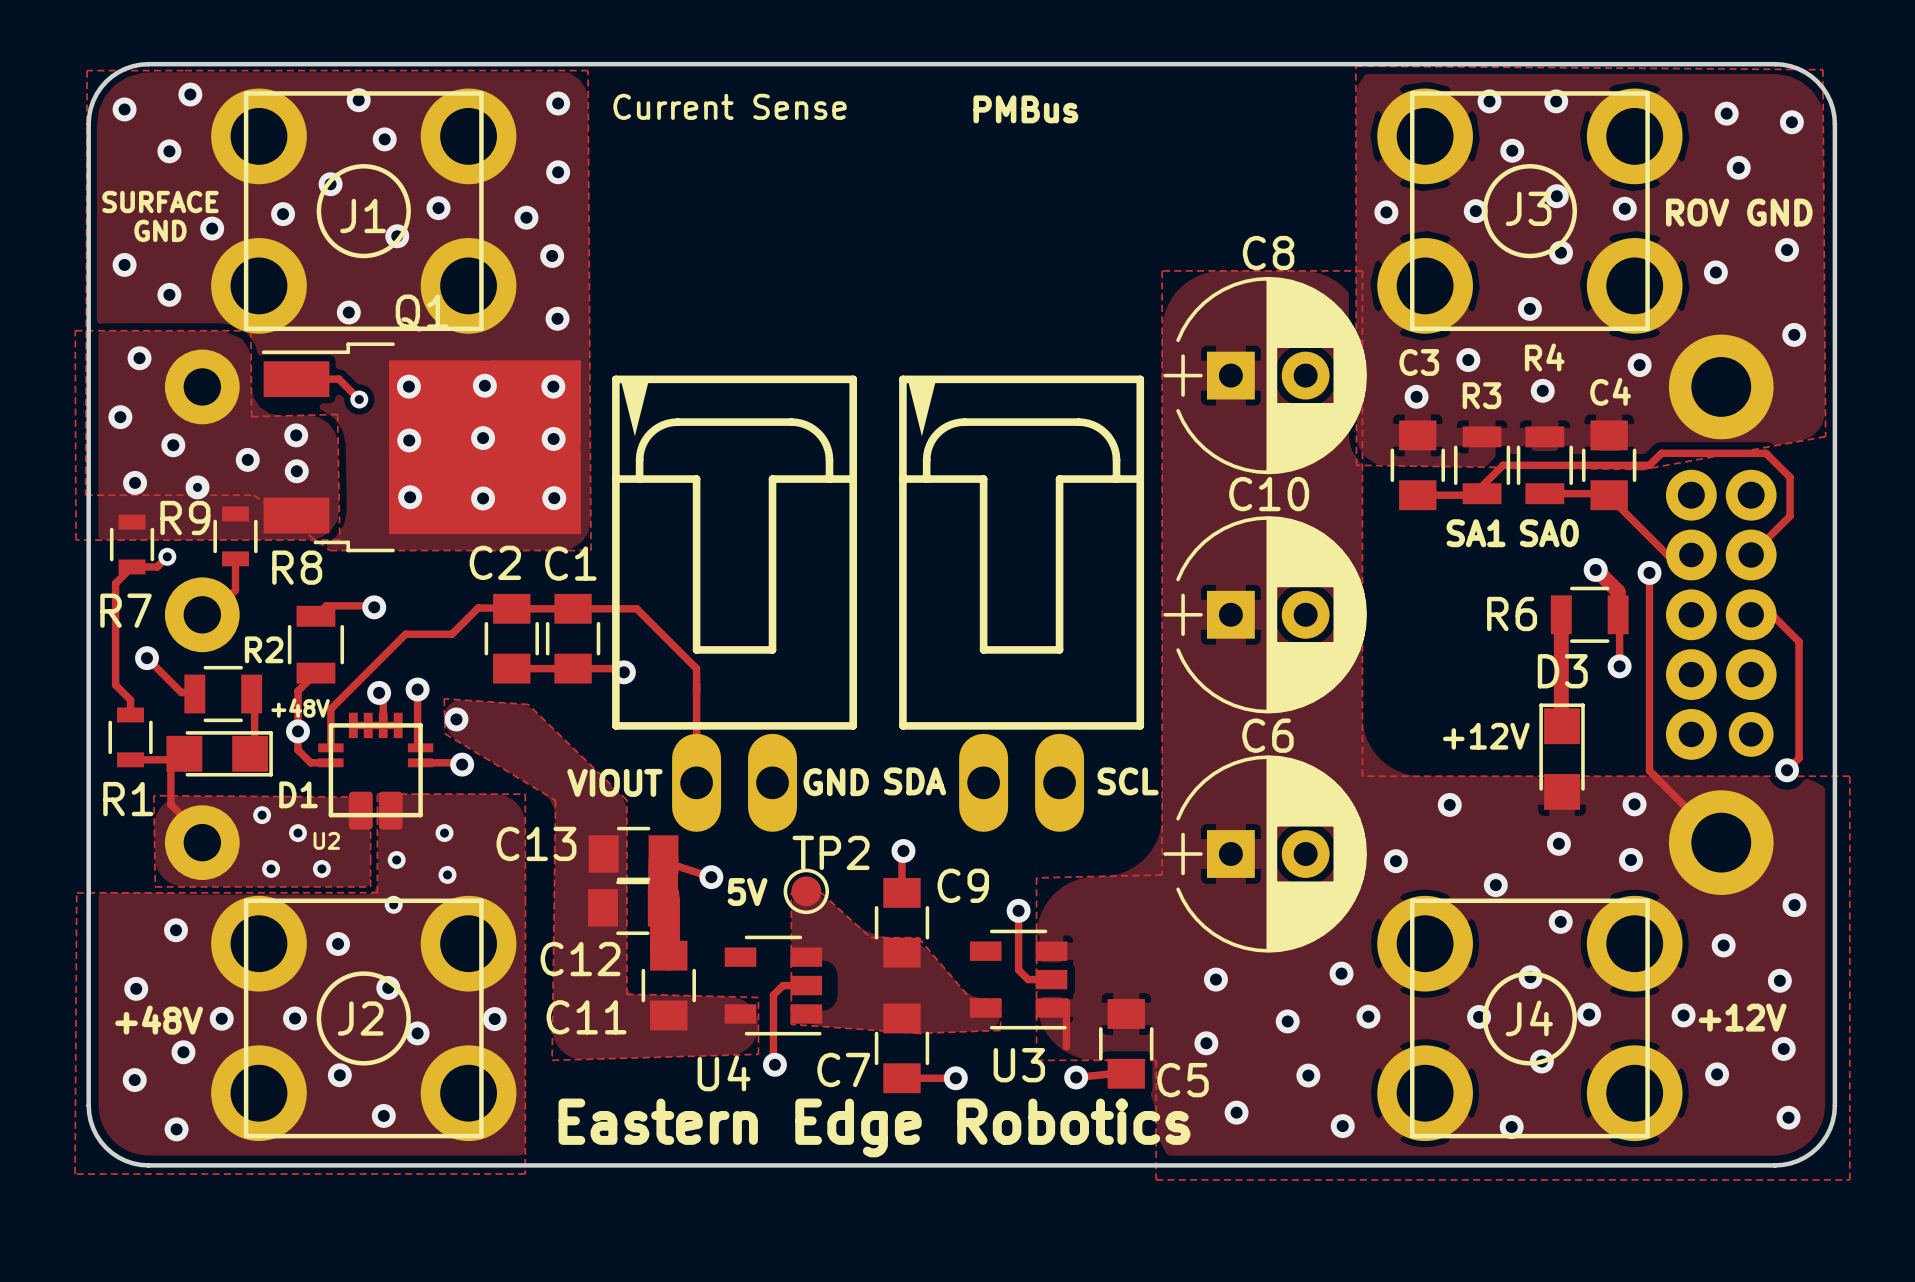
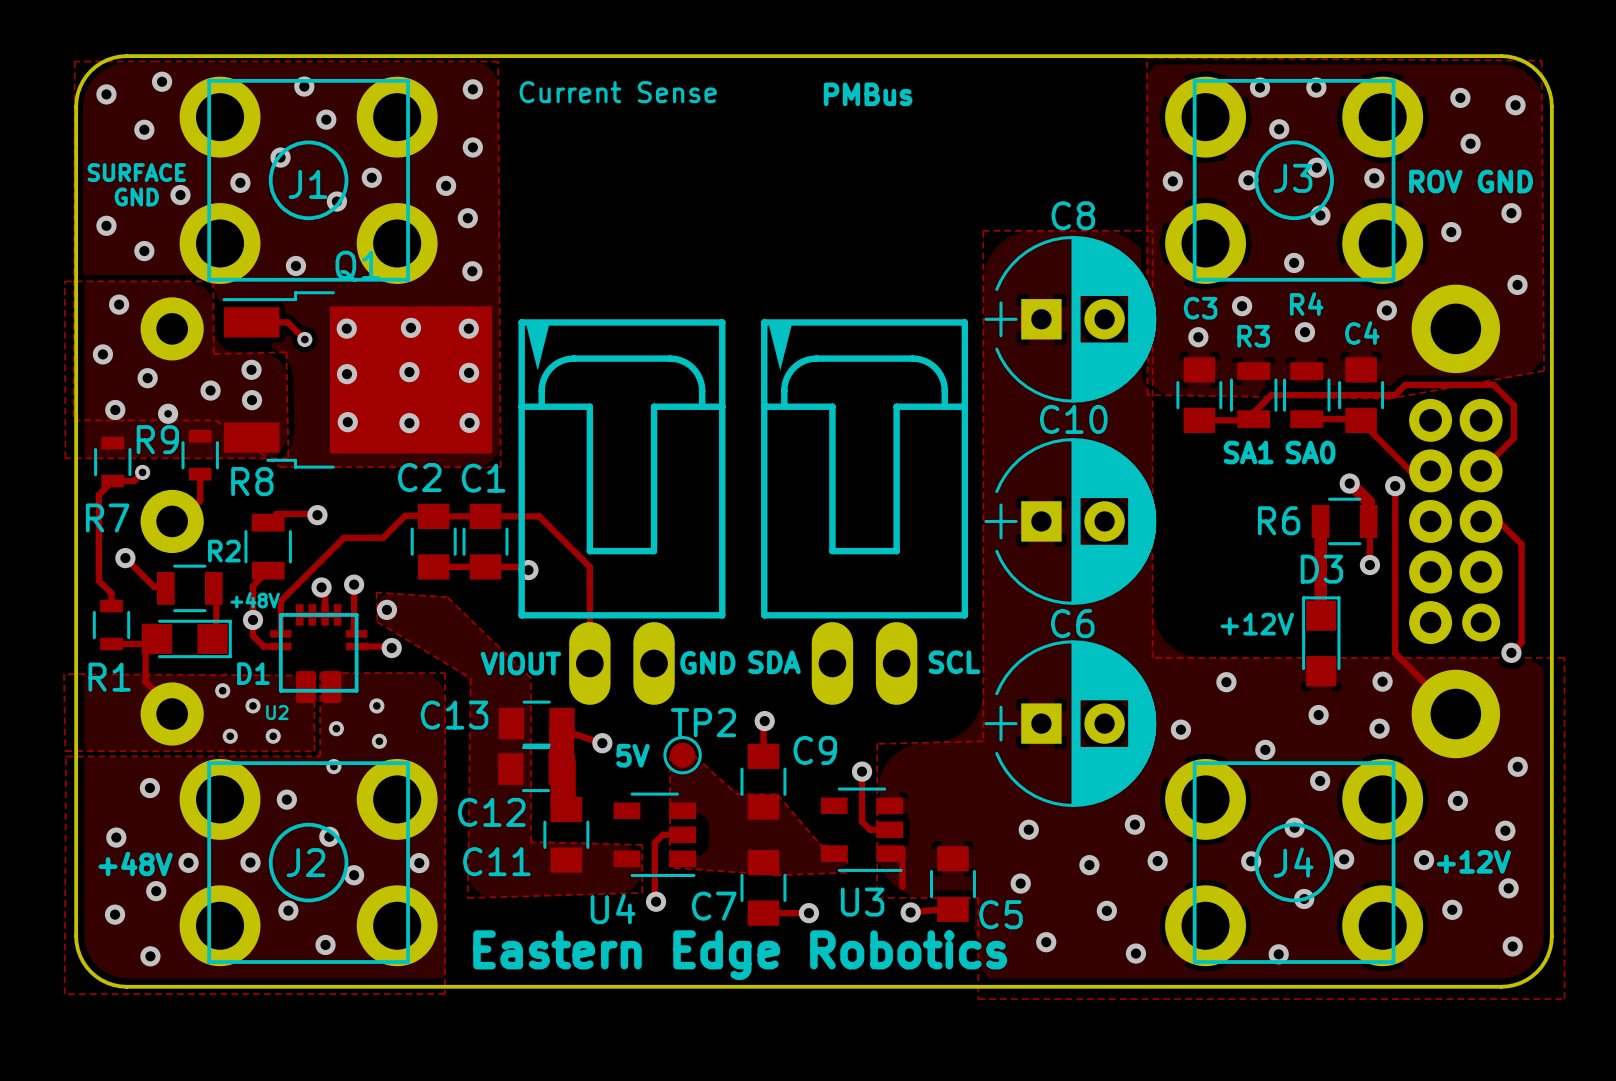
zone outline: (370, 797) (153, 795) (155, 886) (370, 886) -> (314, 675) (64, 674) (65, 751) (314, 751)

